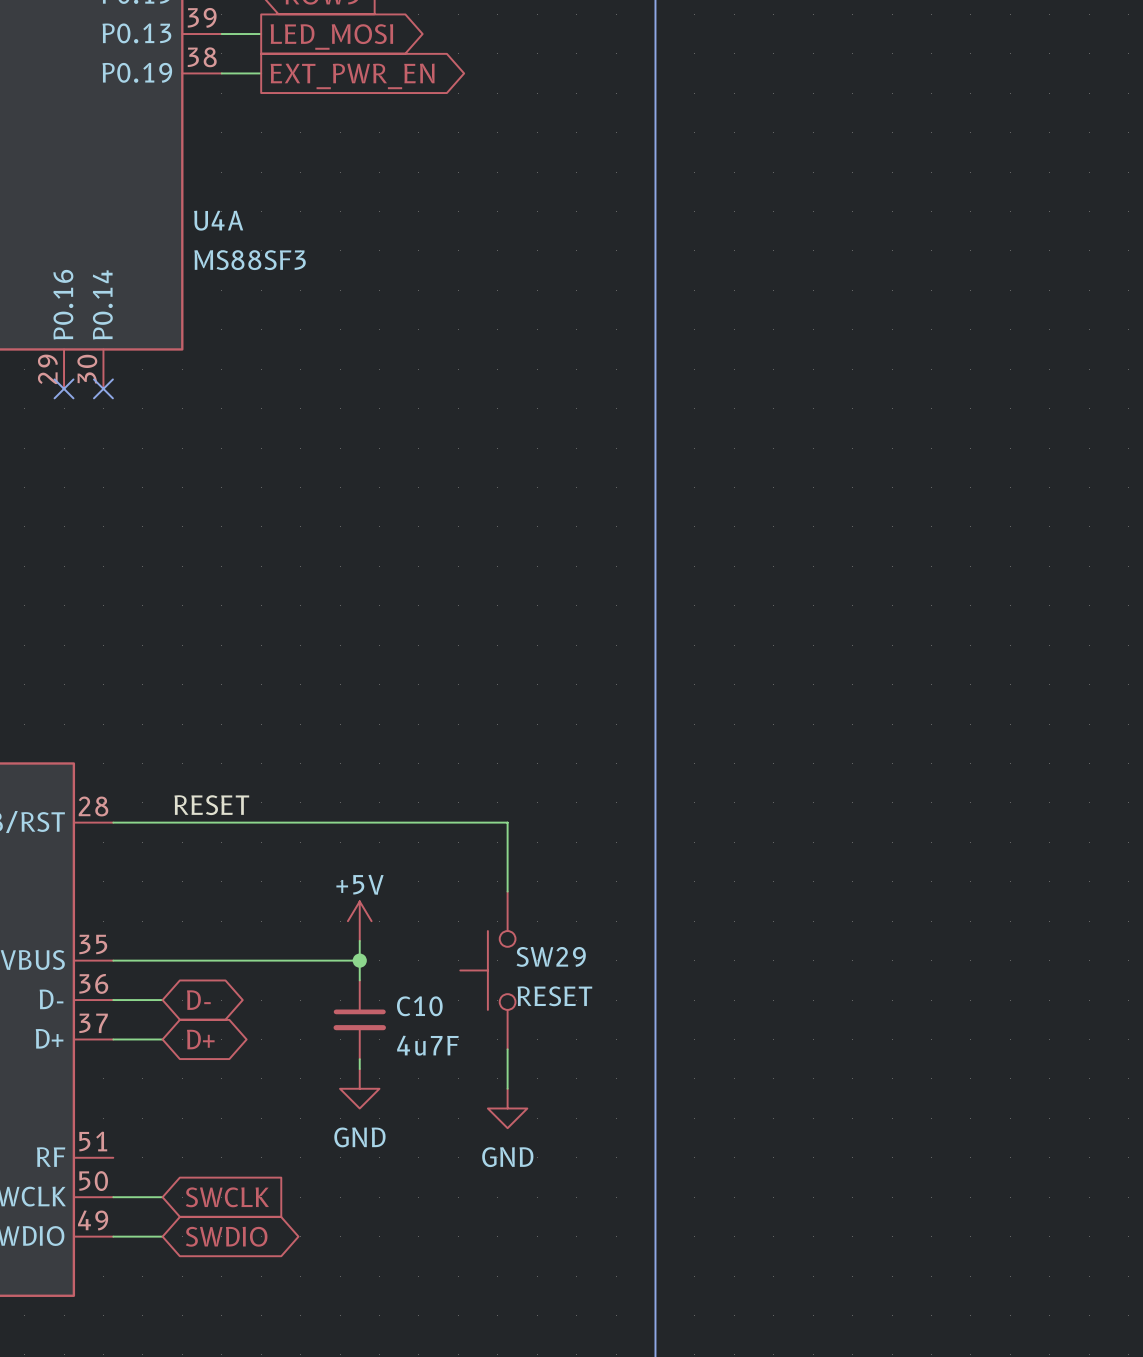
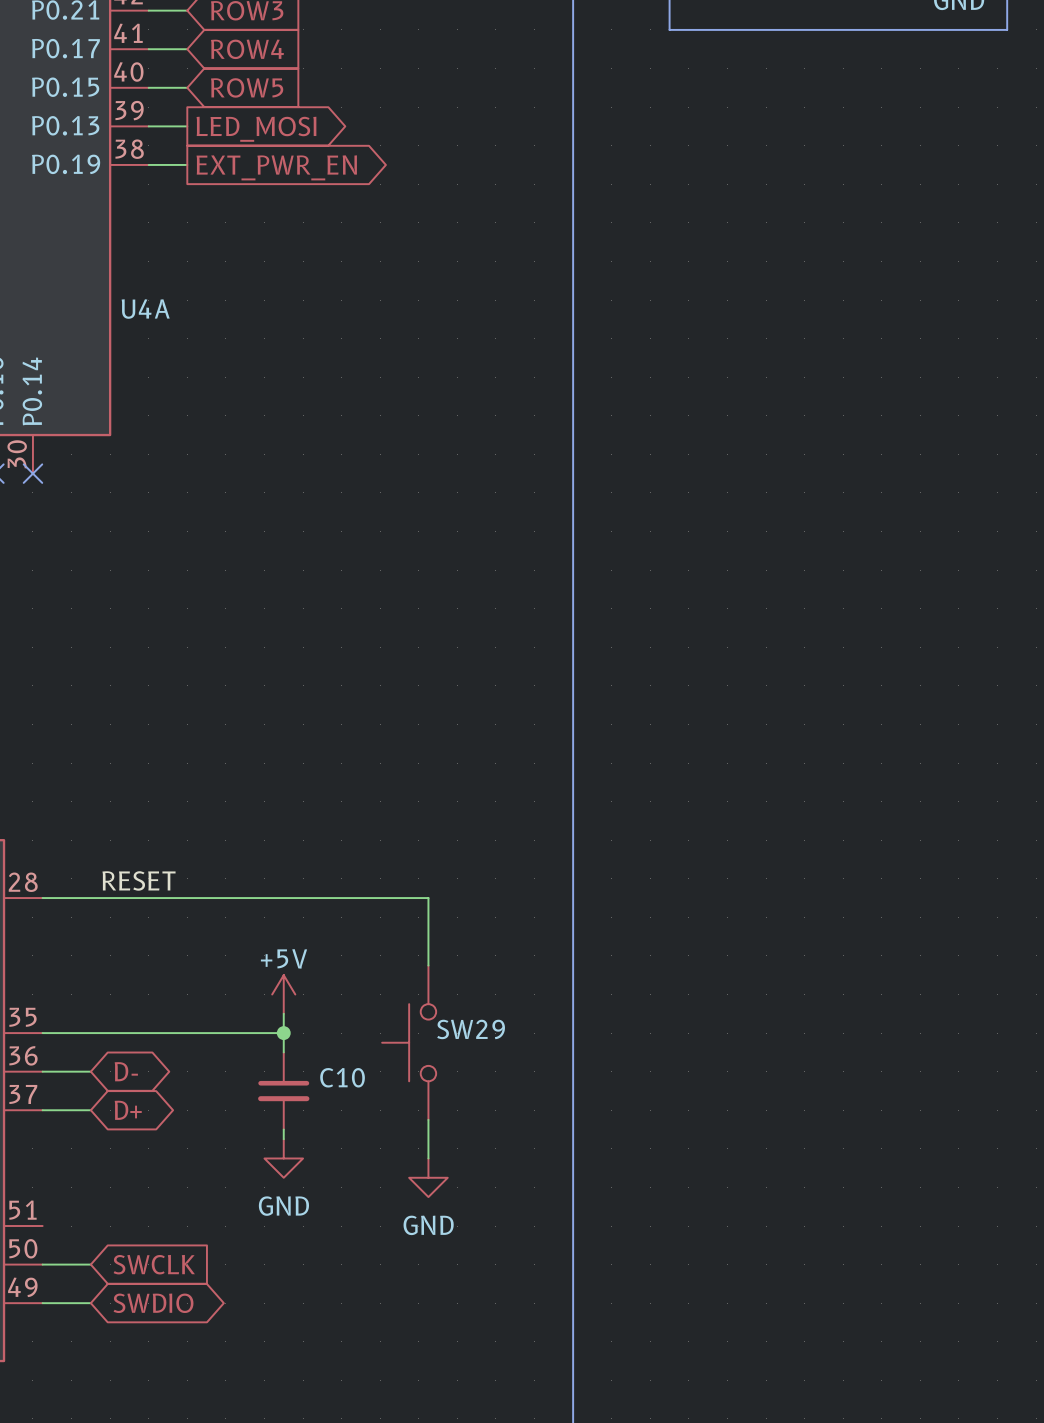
U4A value: MS88SF3 (250, 260) -> none
SW29 value: RESET (554, 996) -> none
C10 value: 4u7F (427, 1045) -> none

